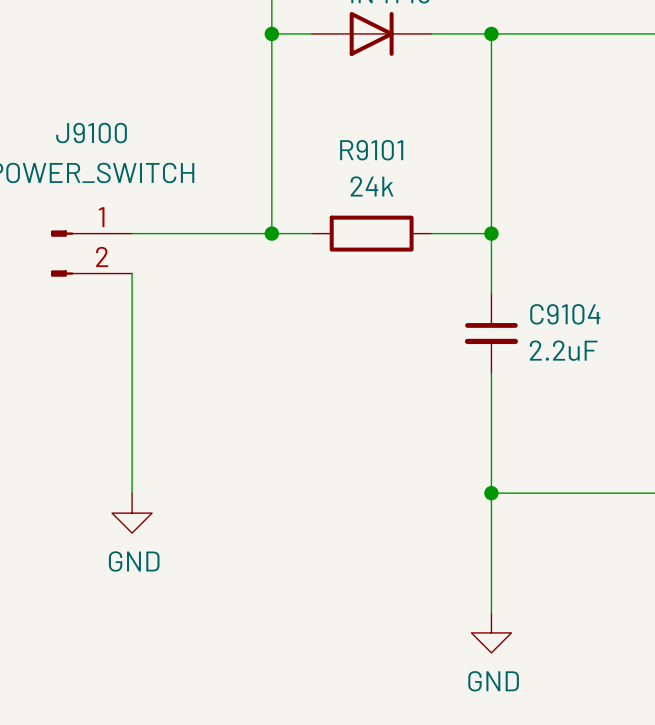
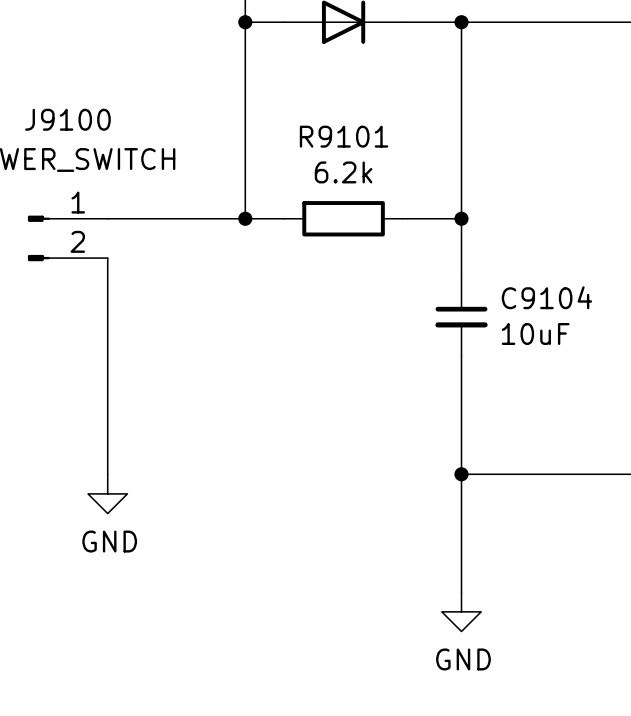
R9101 value: 24k (372, 186) -> 6.2k (343, 172)
C9104 value: 2.2uF (563, 350) -> 10uF (535, 333)

